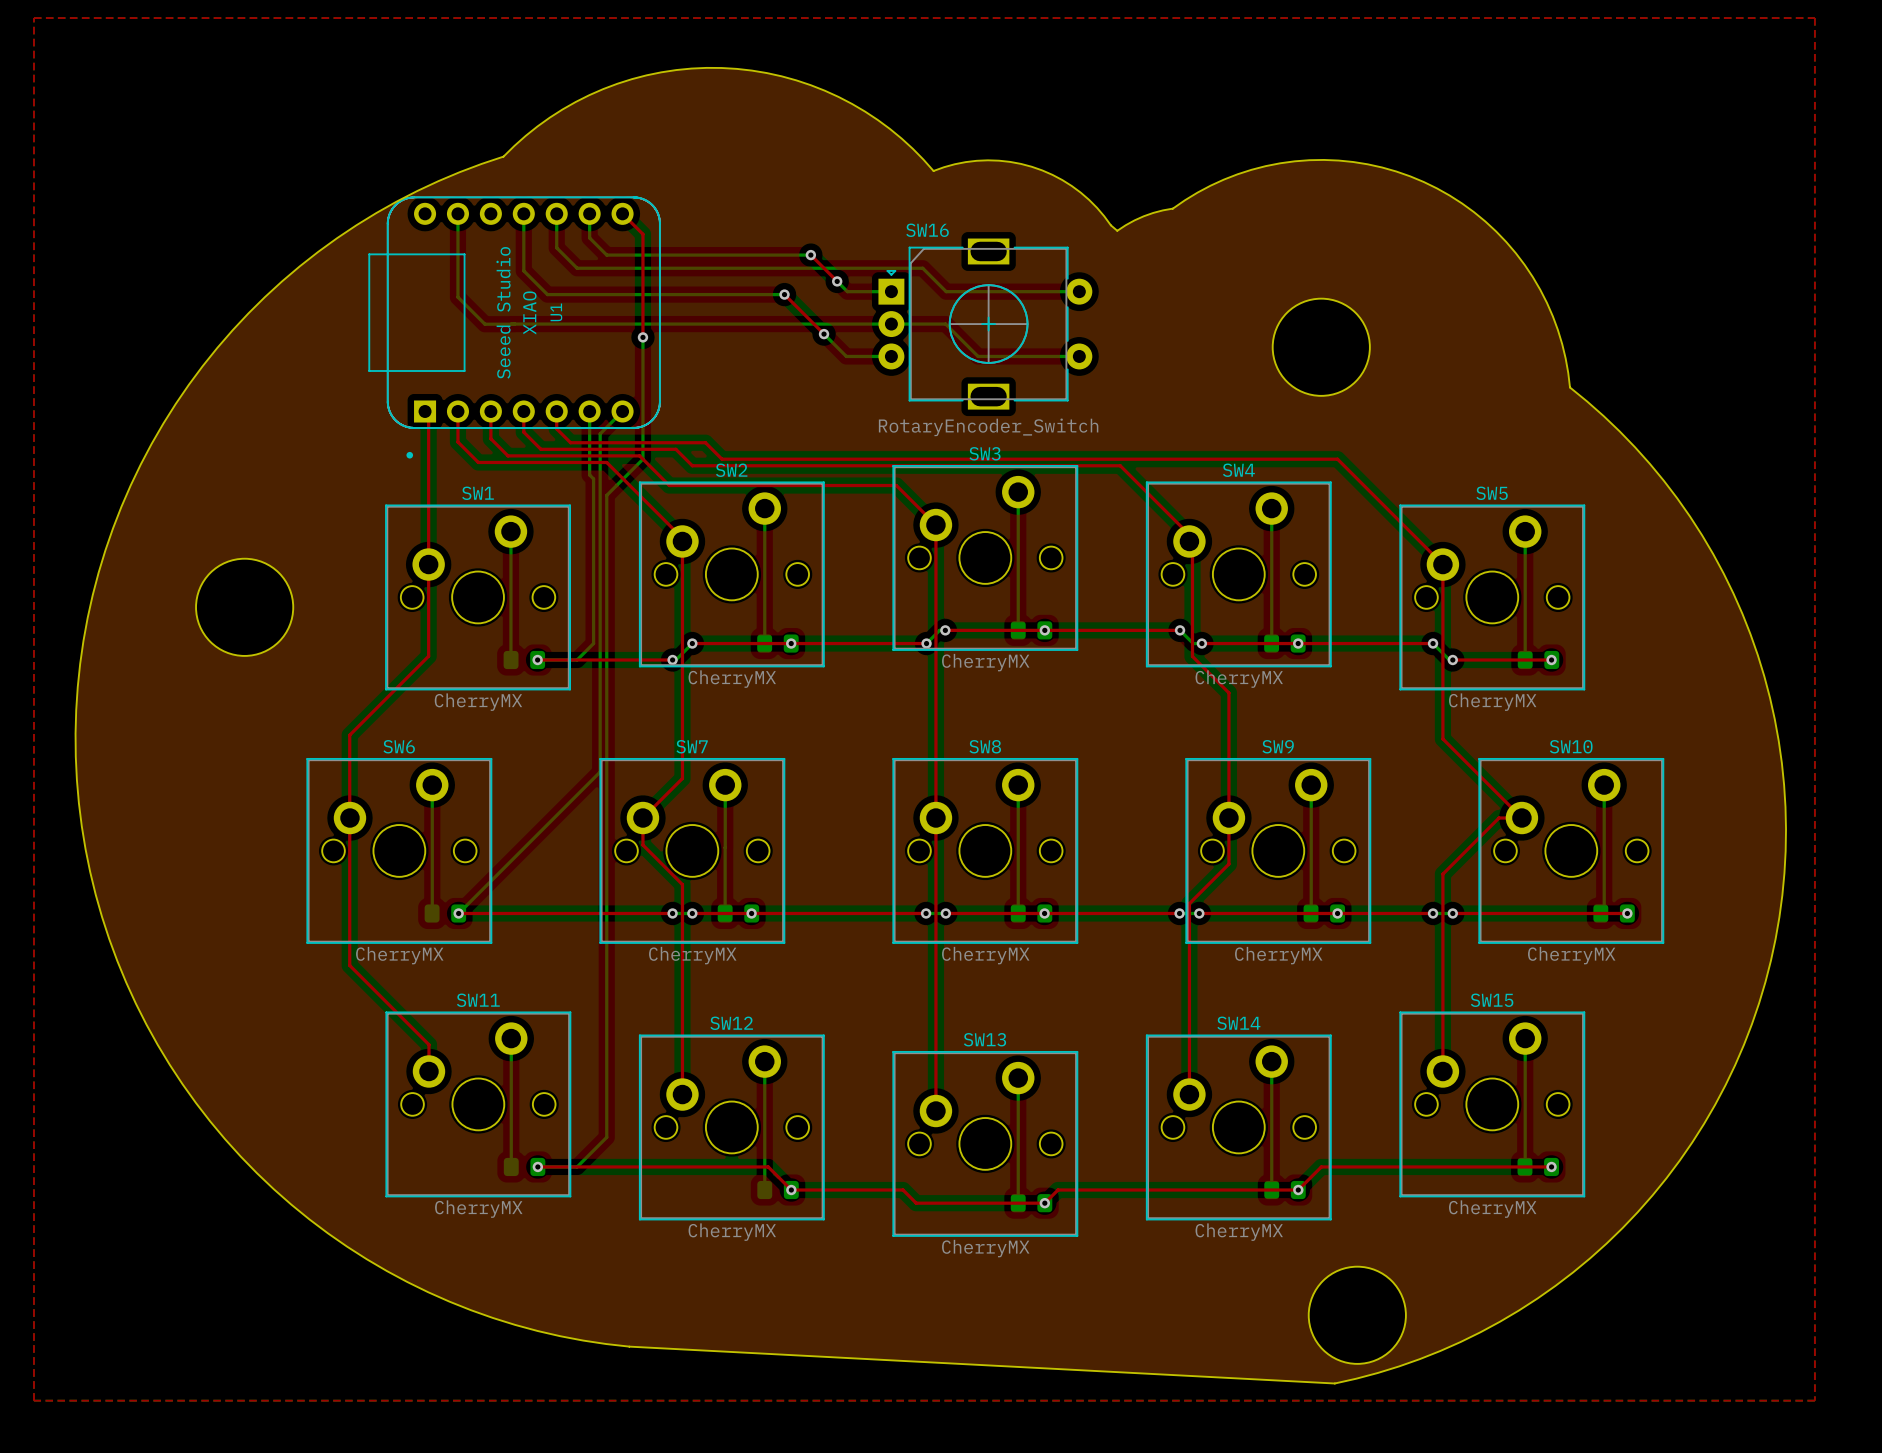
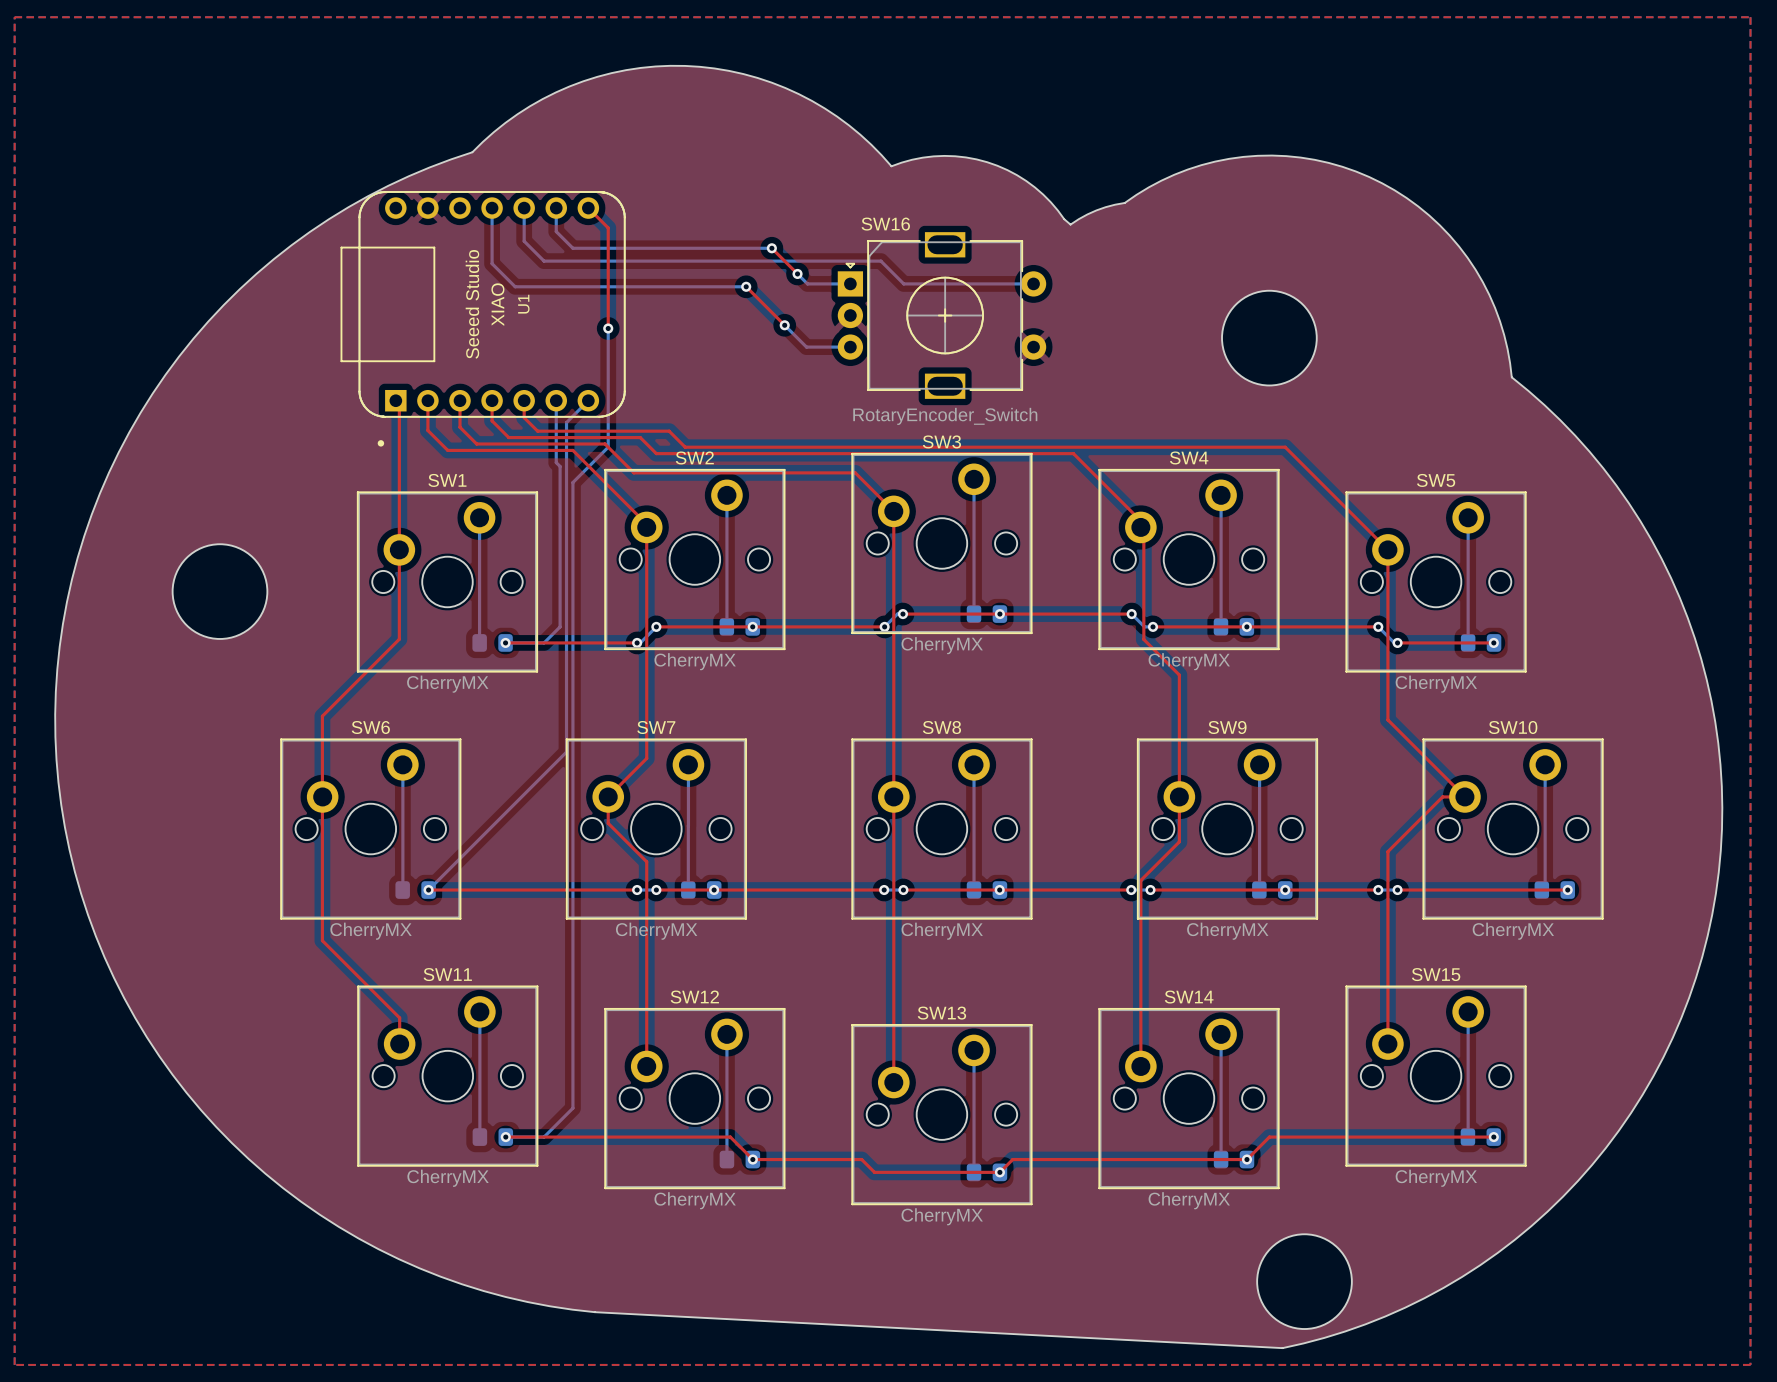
bottom track: (457, 213) (457, 297) (484, 324) (514, 324) -> none
bottom track: (511, 324) (945, 324) (978, 356) (1079, 356) -> none

